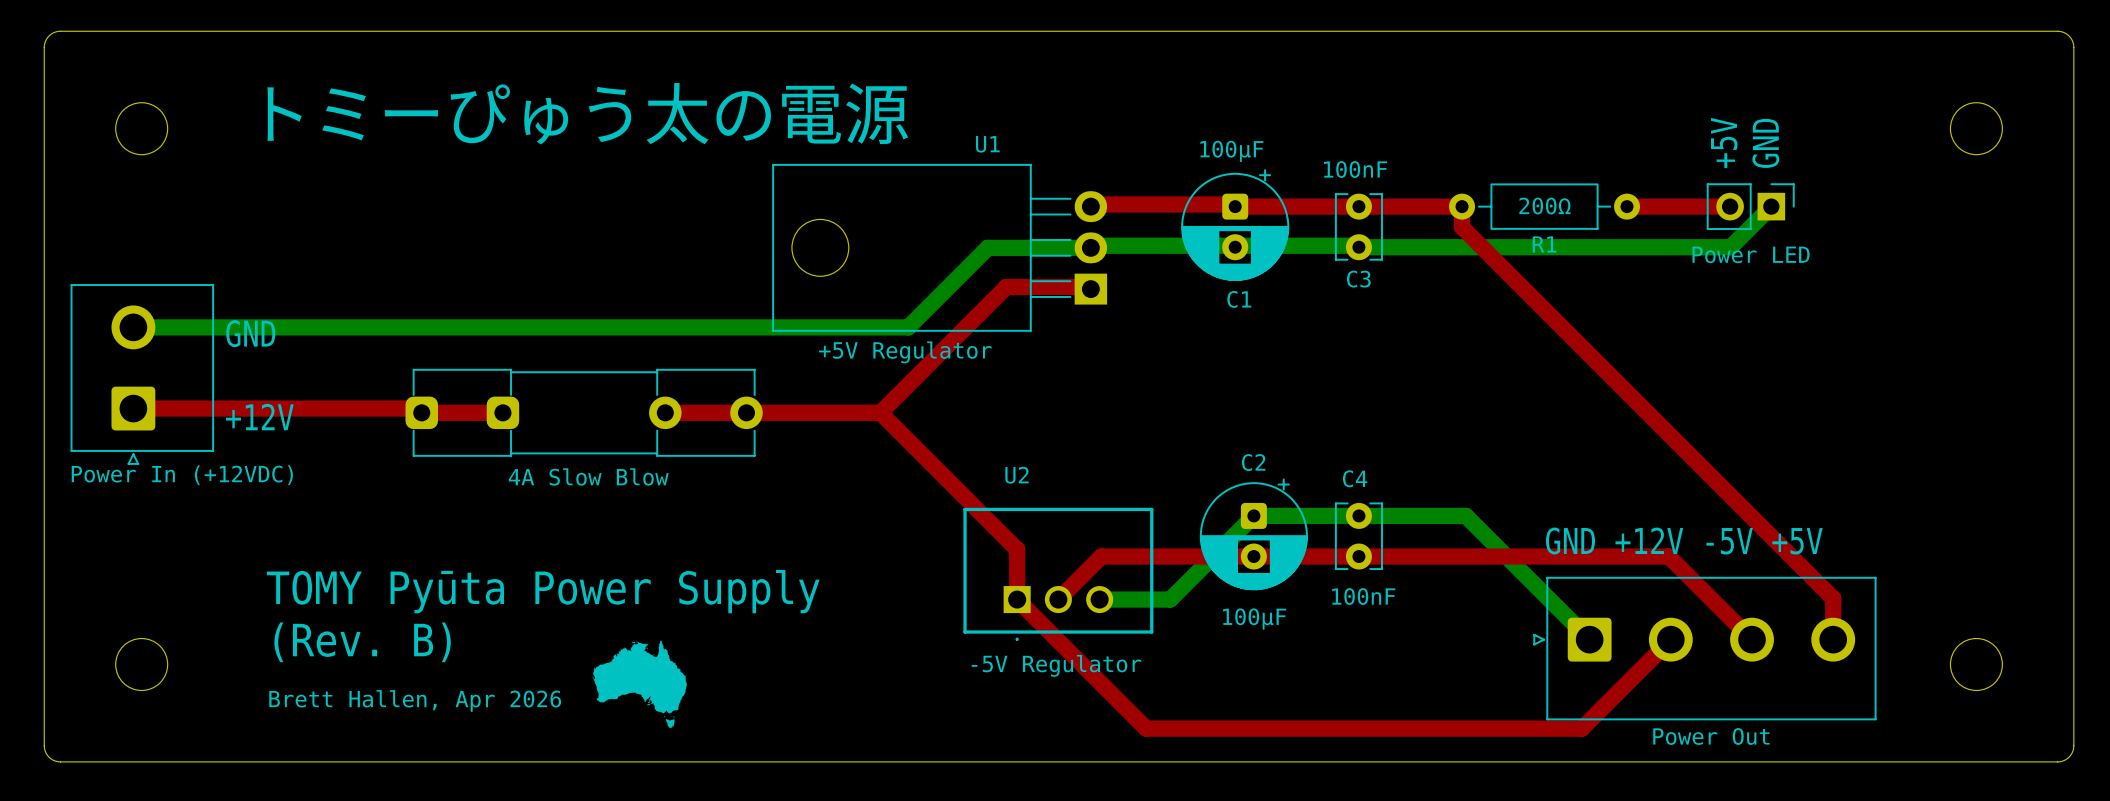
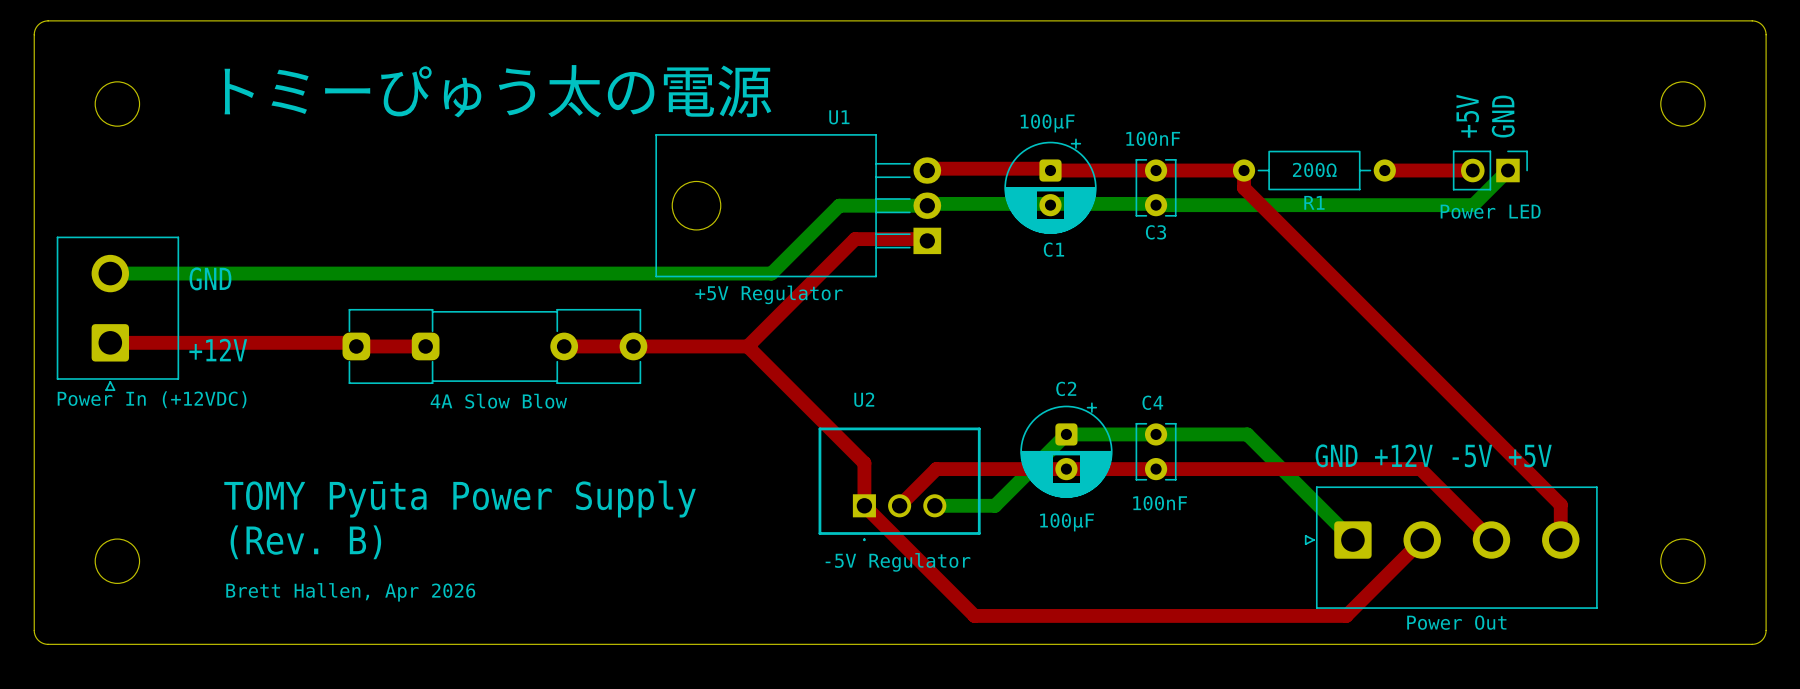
drawing: [592, 639, 687, 729] -> none

